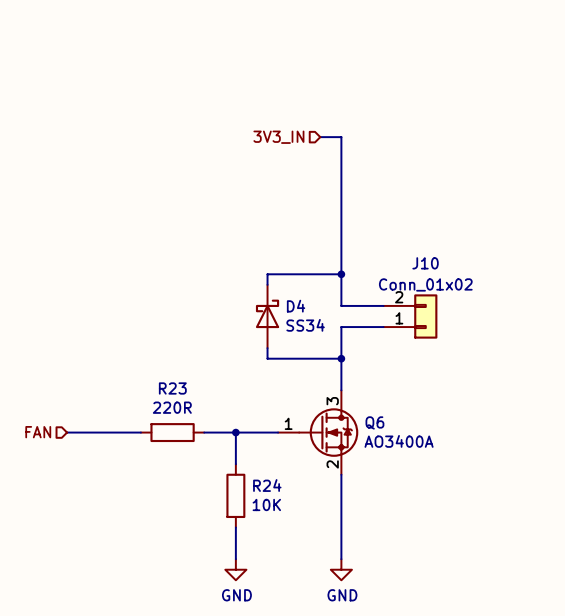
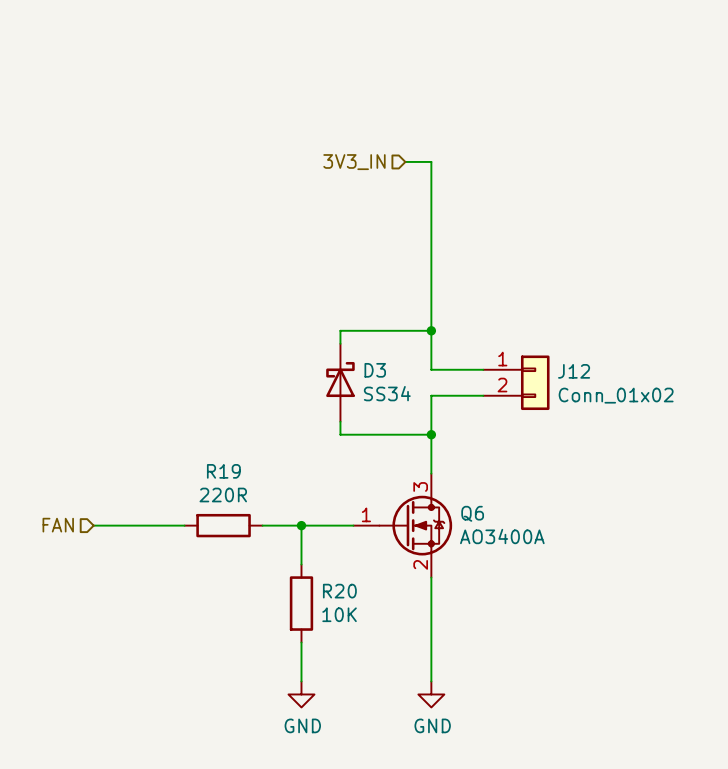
J10 name: J10 (425, 263) -> J12 (574, 371)
J10 value position: Conn_01x02 (425, 284) -> Conn_01x02 (616, 395)
D4 name: D4 (296, 306) -> D3 (375, 370)
J10 flip: as is (425, 316) -> up-down (535, 382)
R23 name: R23 (172, 388) -> R19 (223, 471)
R24 name: R24 (267, 485) -> R20 (339, 591)

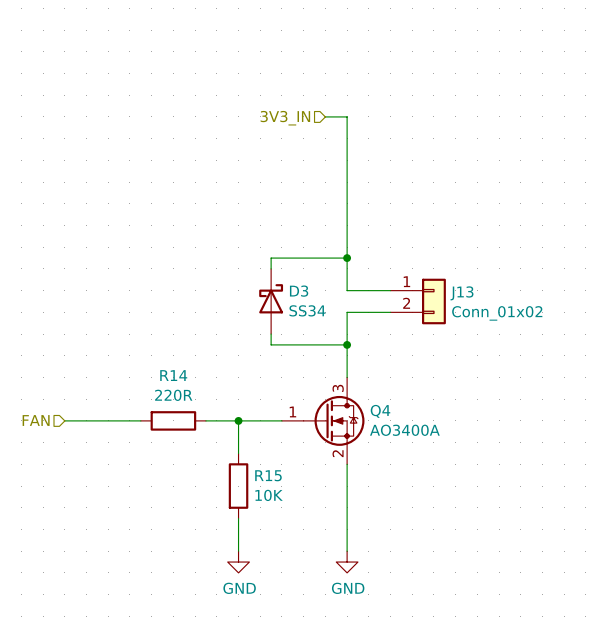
J12 name: J12 (574, 371) -> J13 (462, 293)
R19 name: R19 (223, 471) -> R14 (173, 375)
Q6 name: Q6 (472, 513) -> Q4 (380, 411)
R20 name: R20 (339, 591) -> R15 (268, 475)

